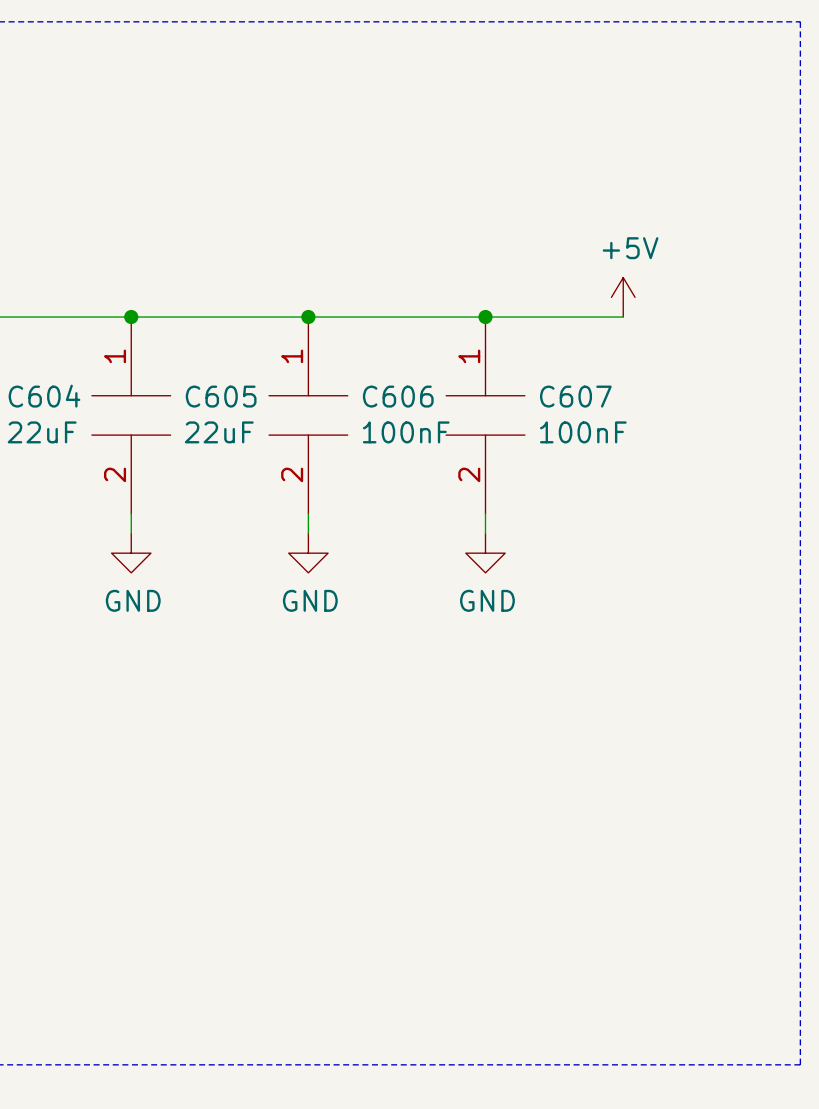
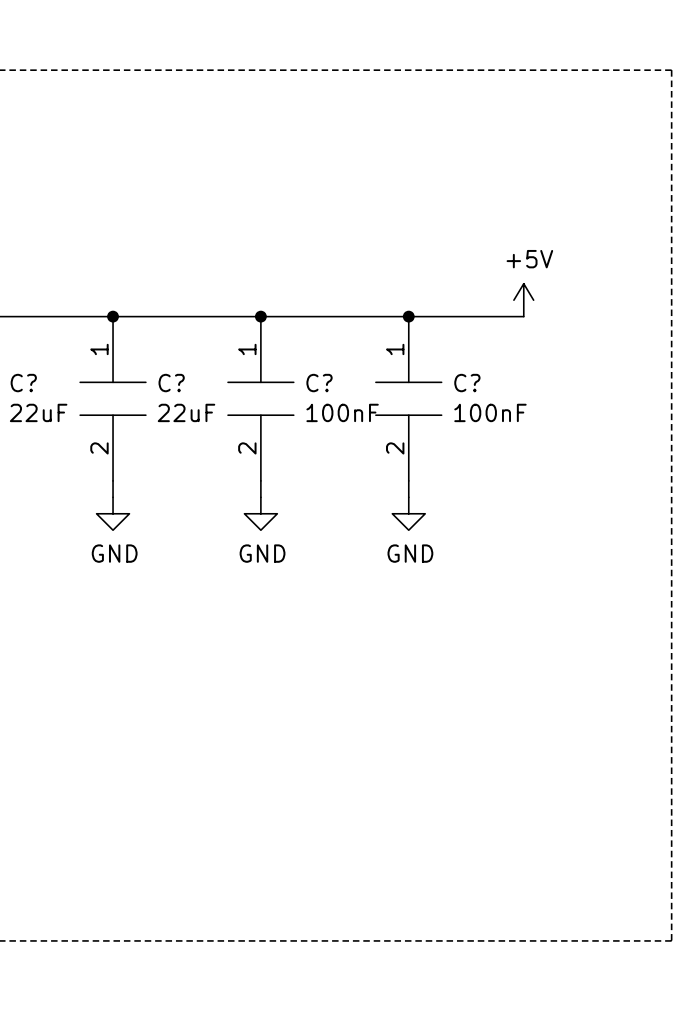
C604 name: C604 (44, 396) -> C? (23, 383)
C605 name: C605 (221, 396) -> C? (171, 383)
C606 name: C606 (398, 396) -> C? (319, 383)
C607 name: C607 (575, 396) -> C? (467, 383)

